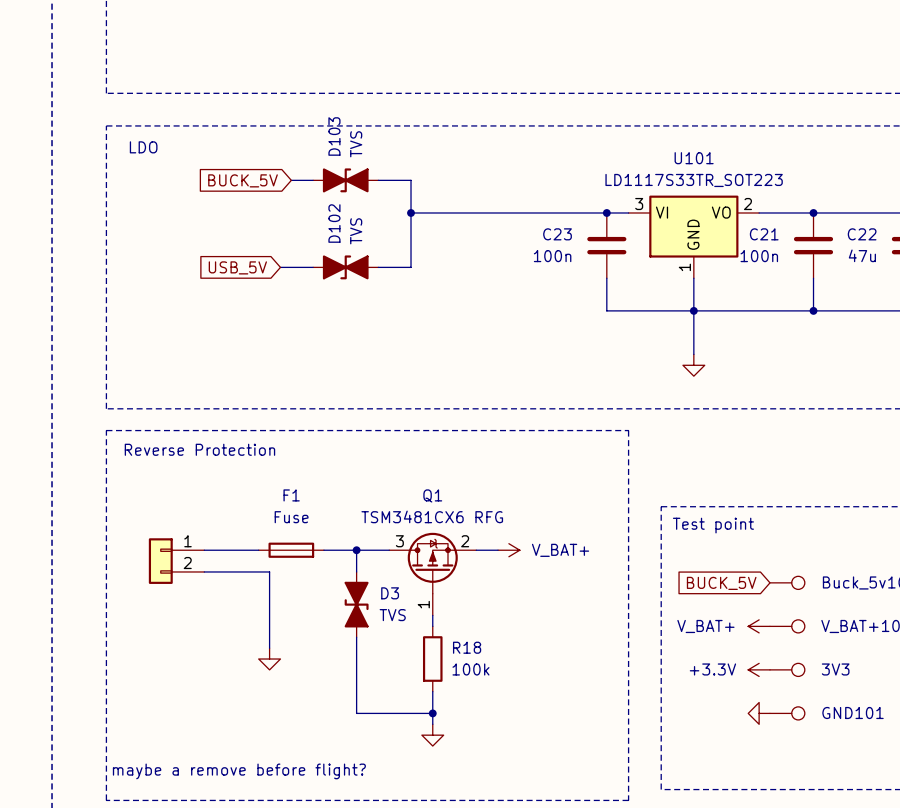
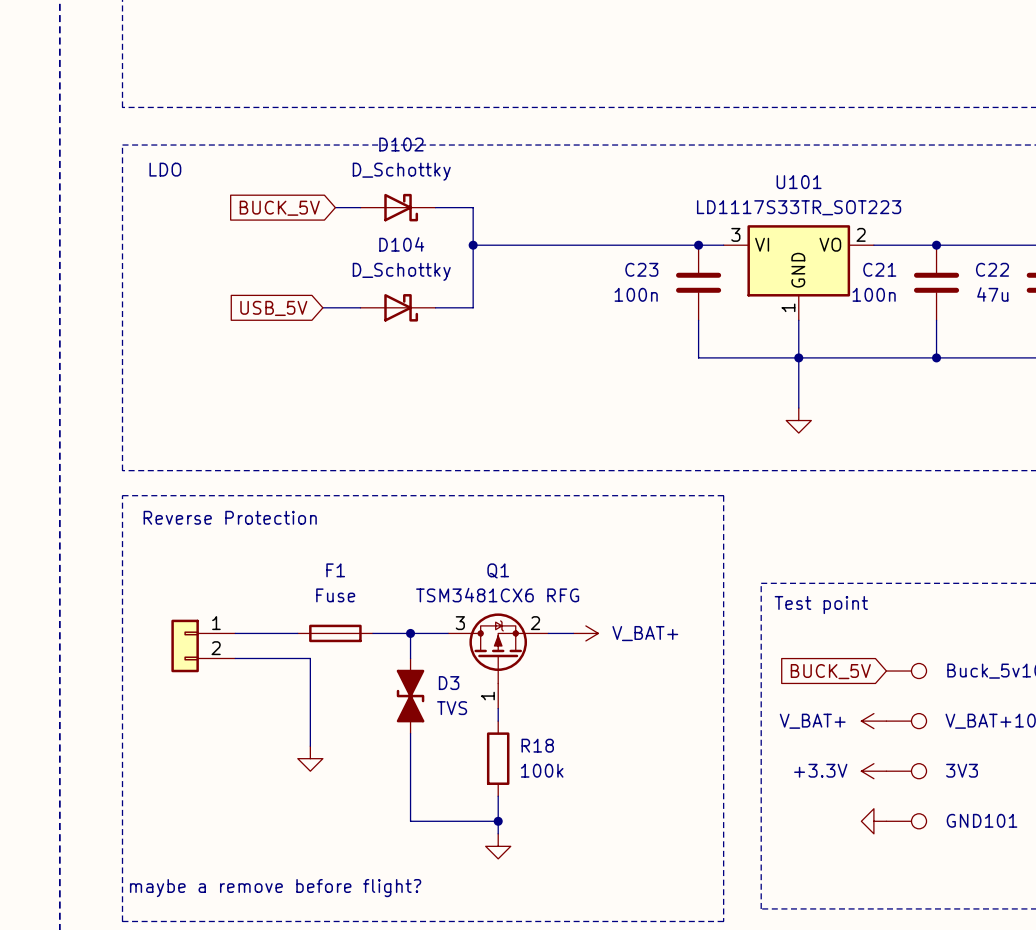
D103: TVS (345, 180) -> none
D102 value: TVS (356, 231) -> D_Schottky (401, 171)
D102 symbol: [313, 255, 379, 280] -> [360, 193, 436, 222]
D104: none -> D_Schottky (398, 307)

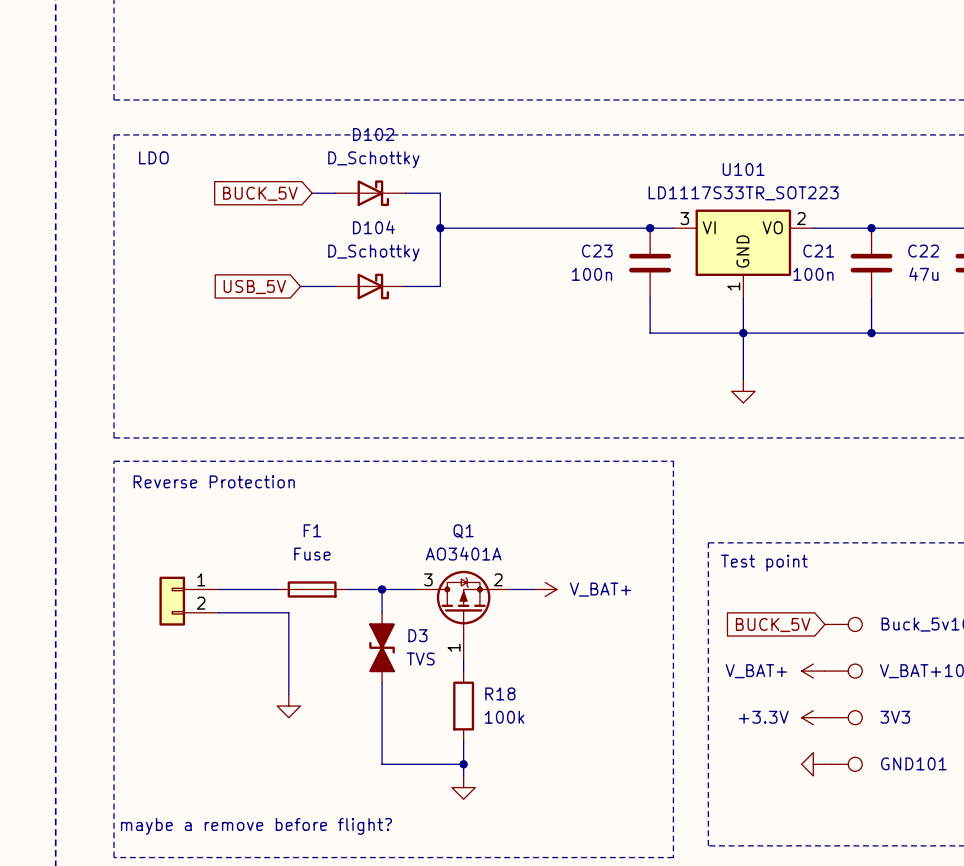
Q1 value: TSM3481CX6 RFG (497, 595) -> AO3401A (463, 553)

